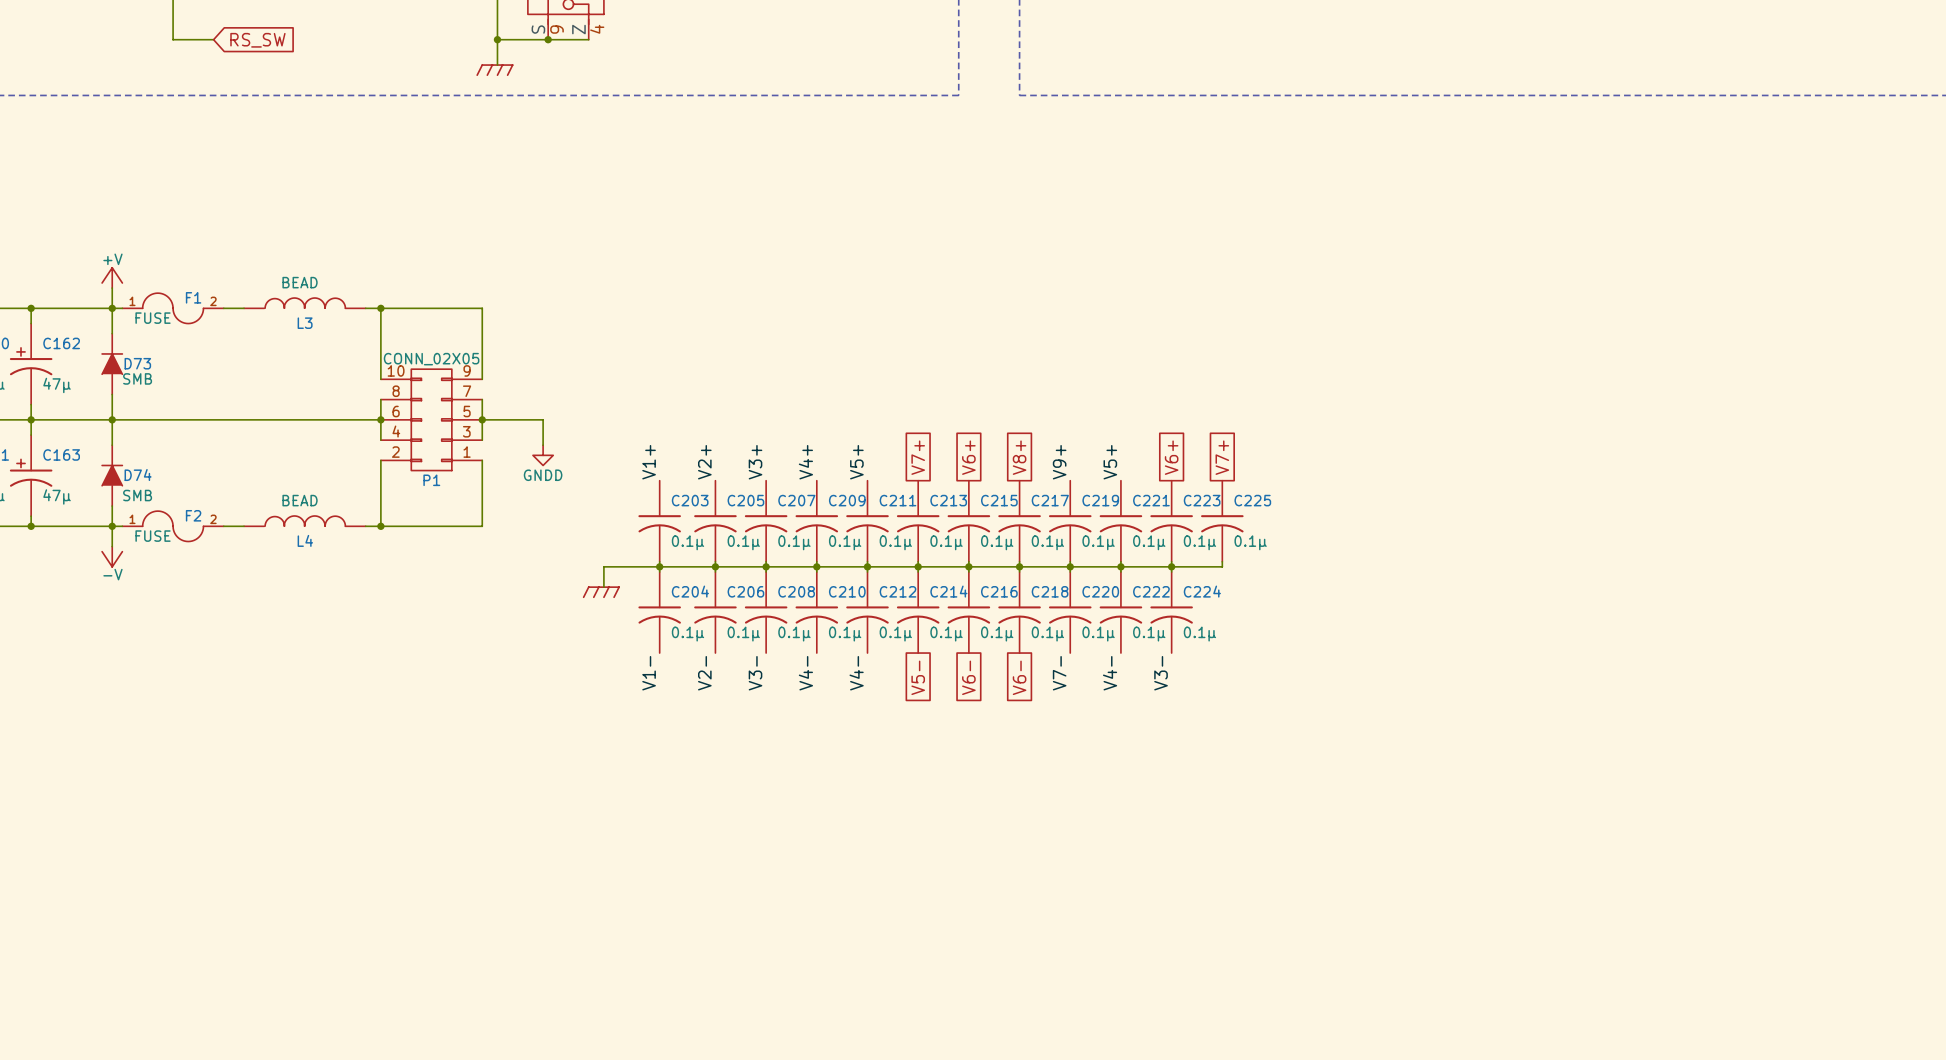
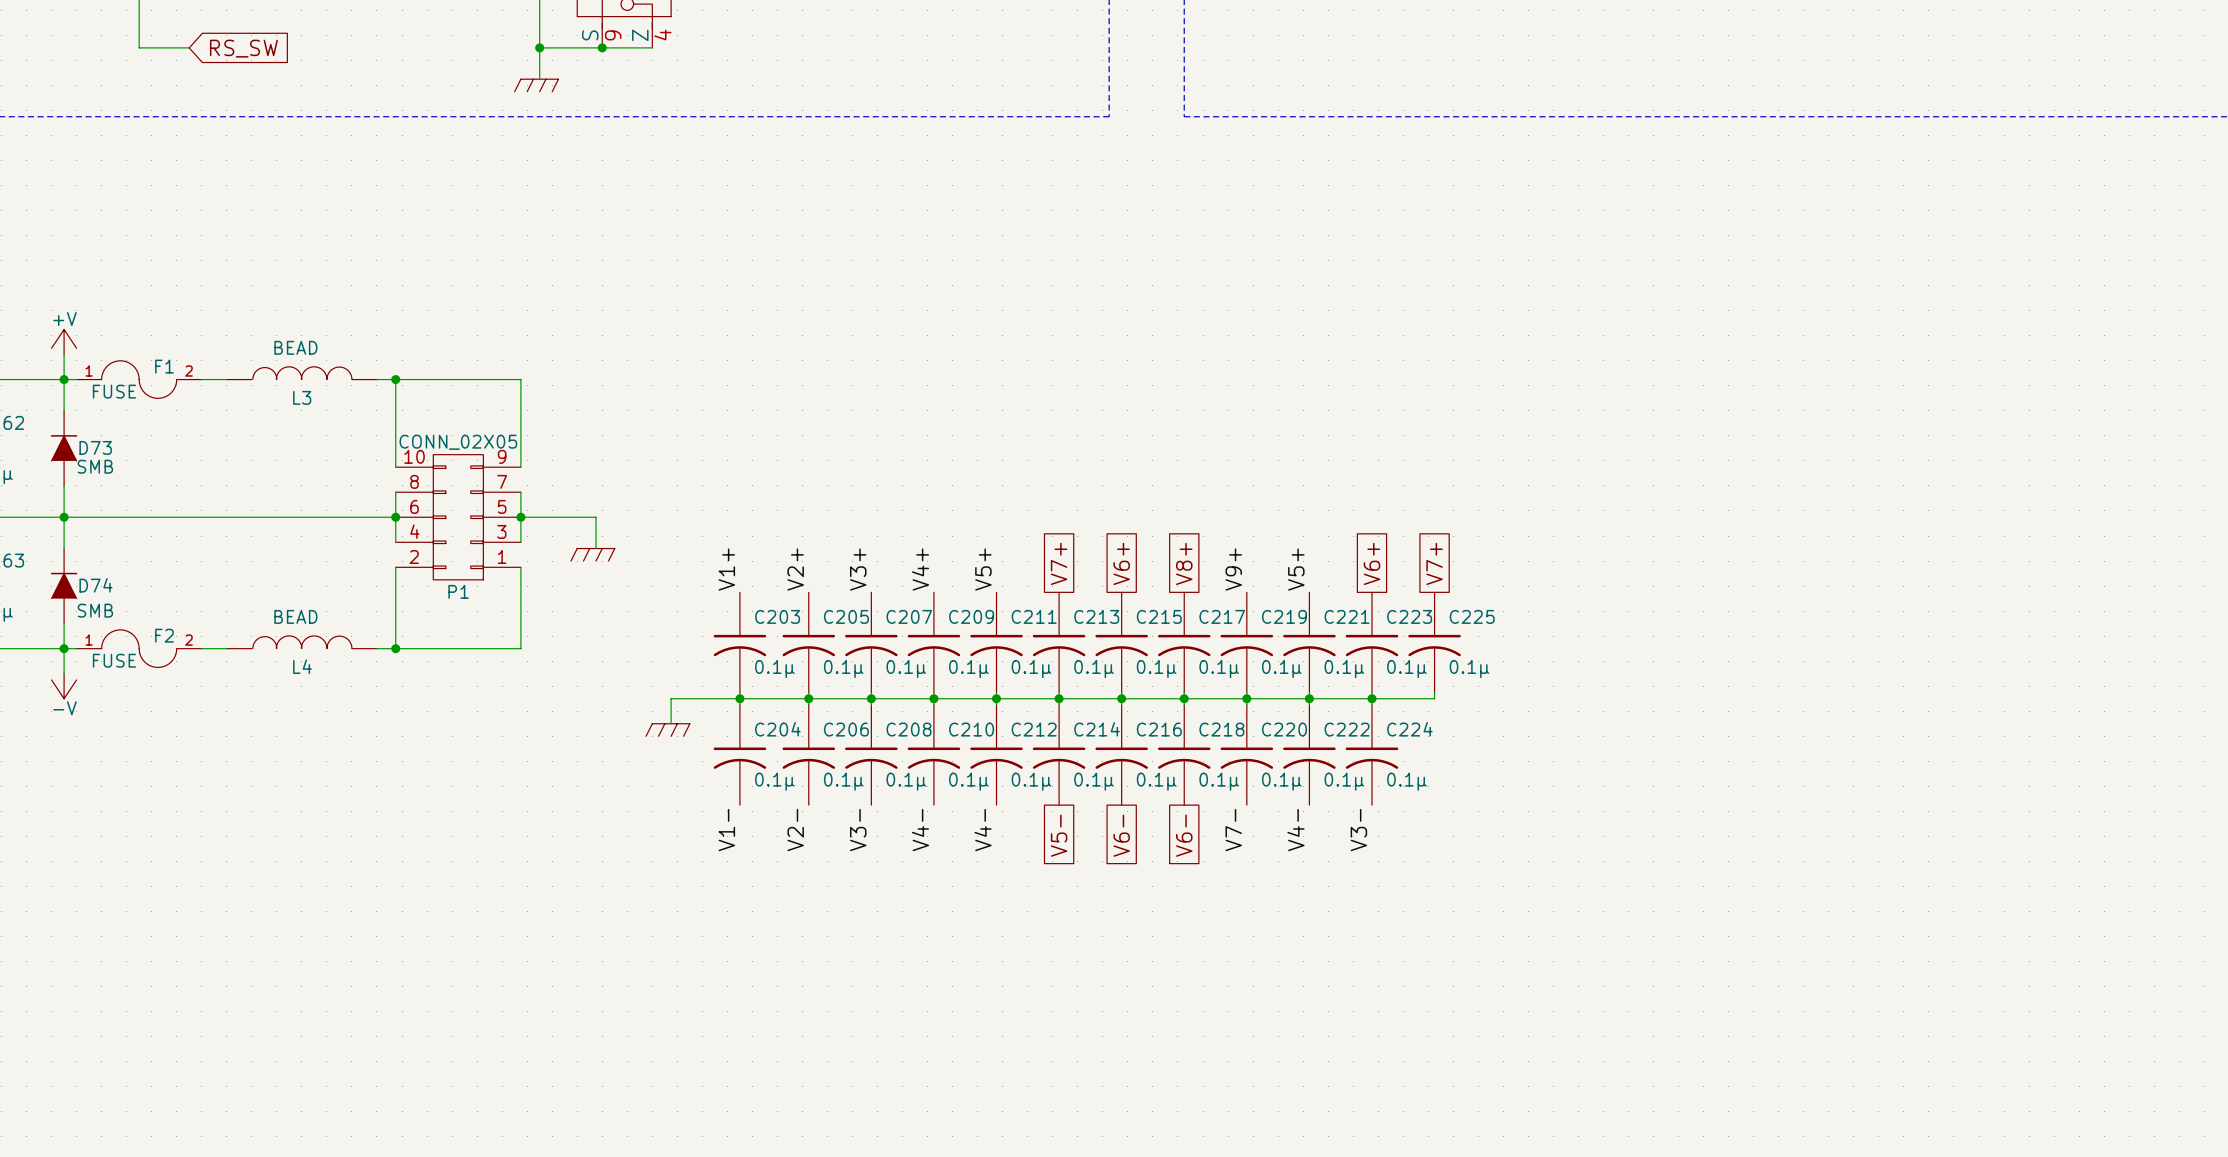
power symbol shape: [532, 445, 554, 466] -> [570, 548, 615, 562]
power symbol text: GNDD (543, 475) -> none

